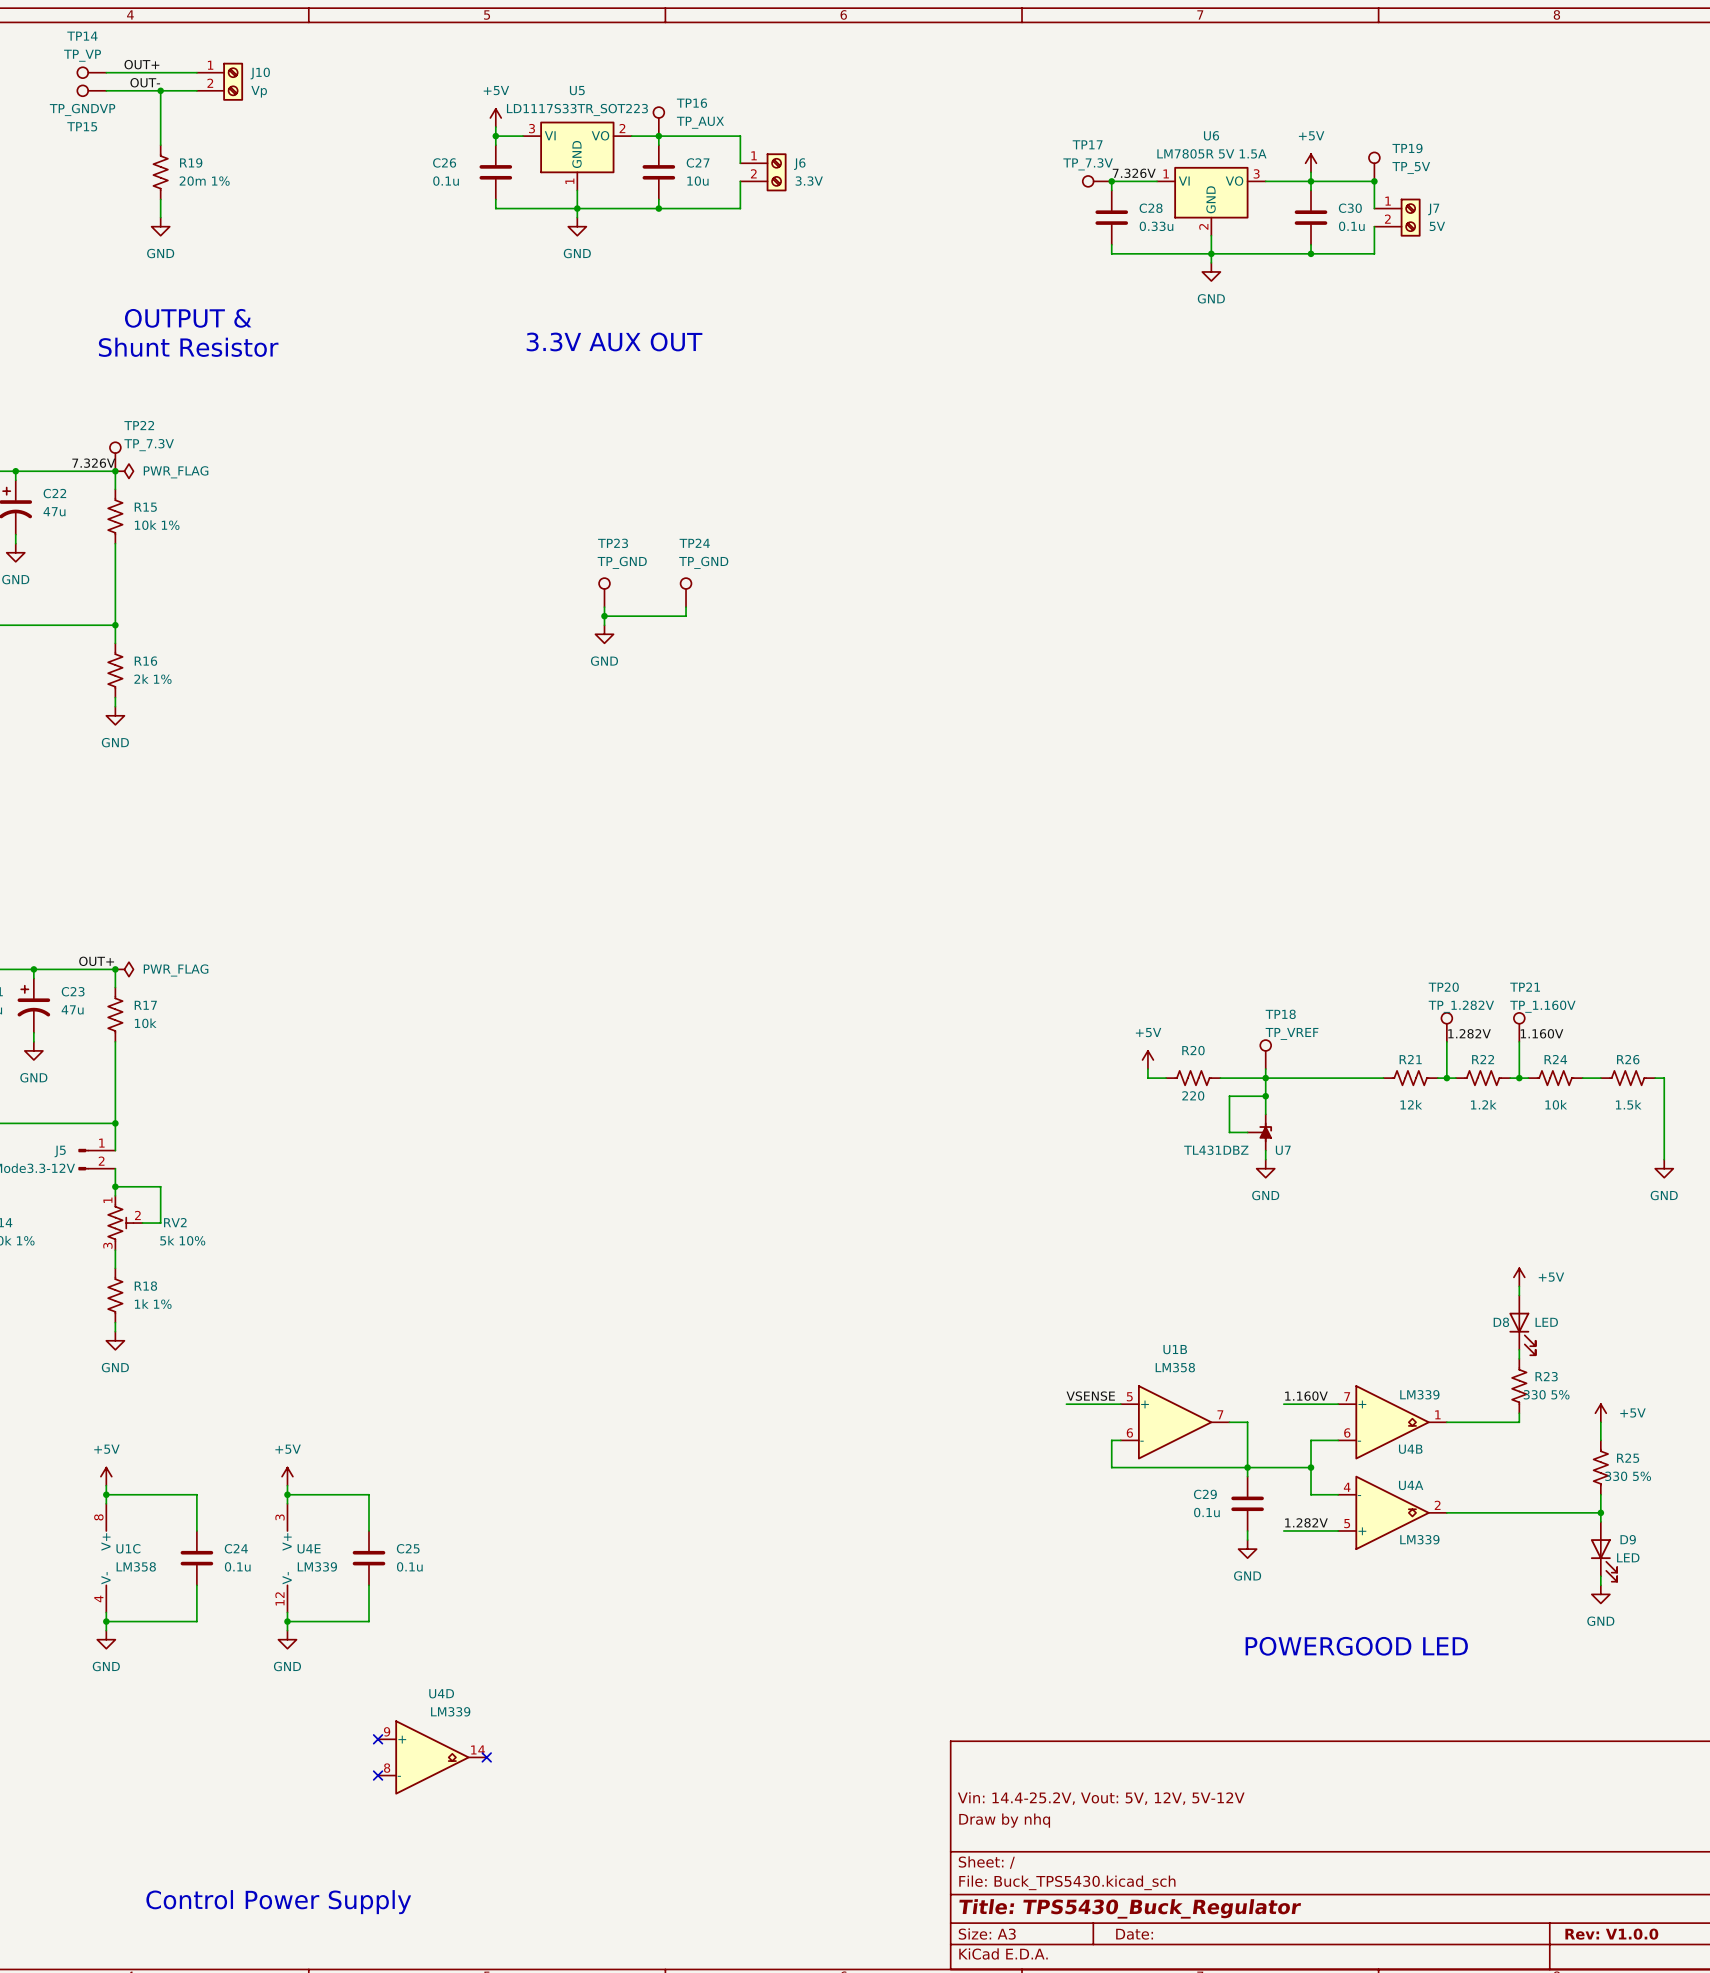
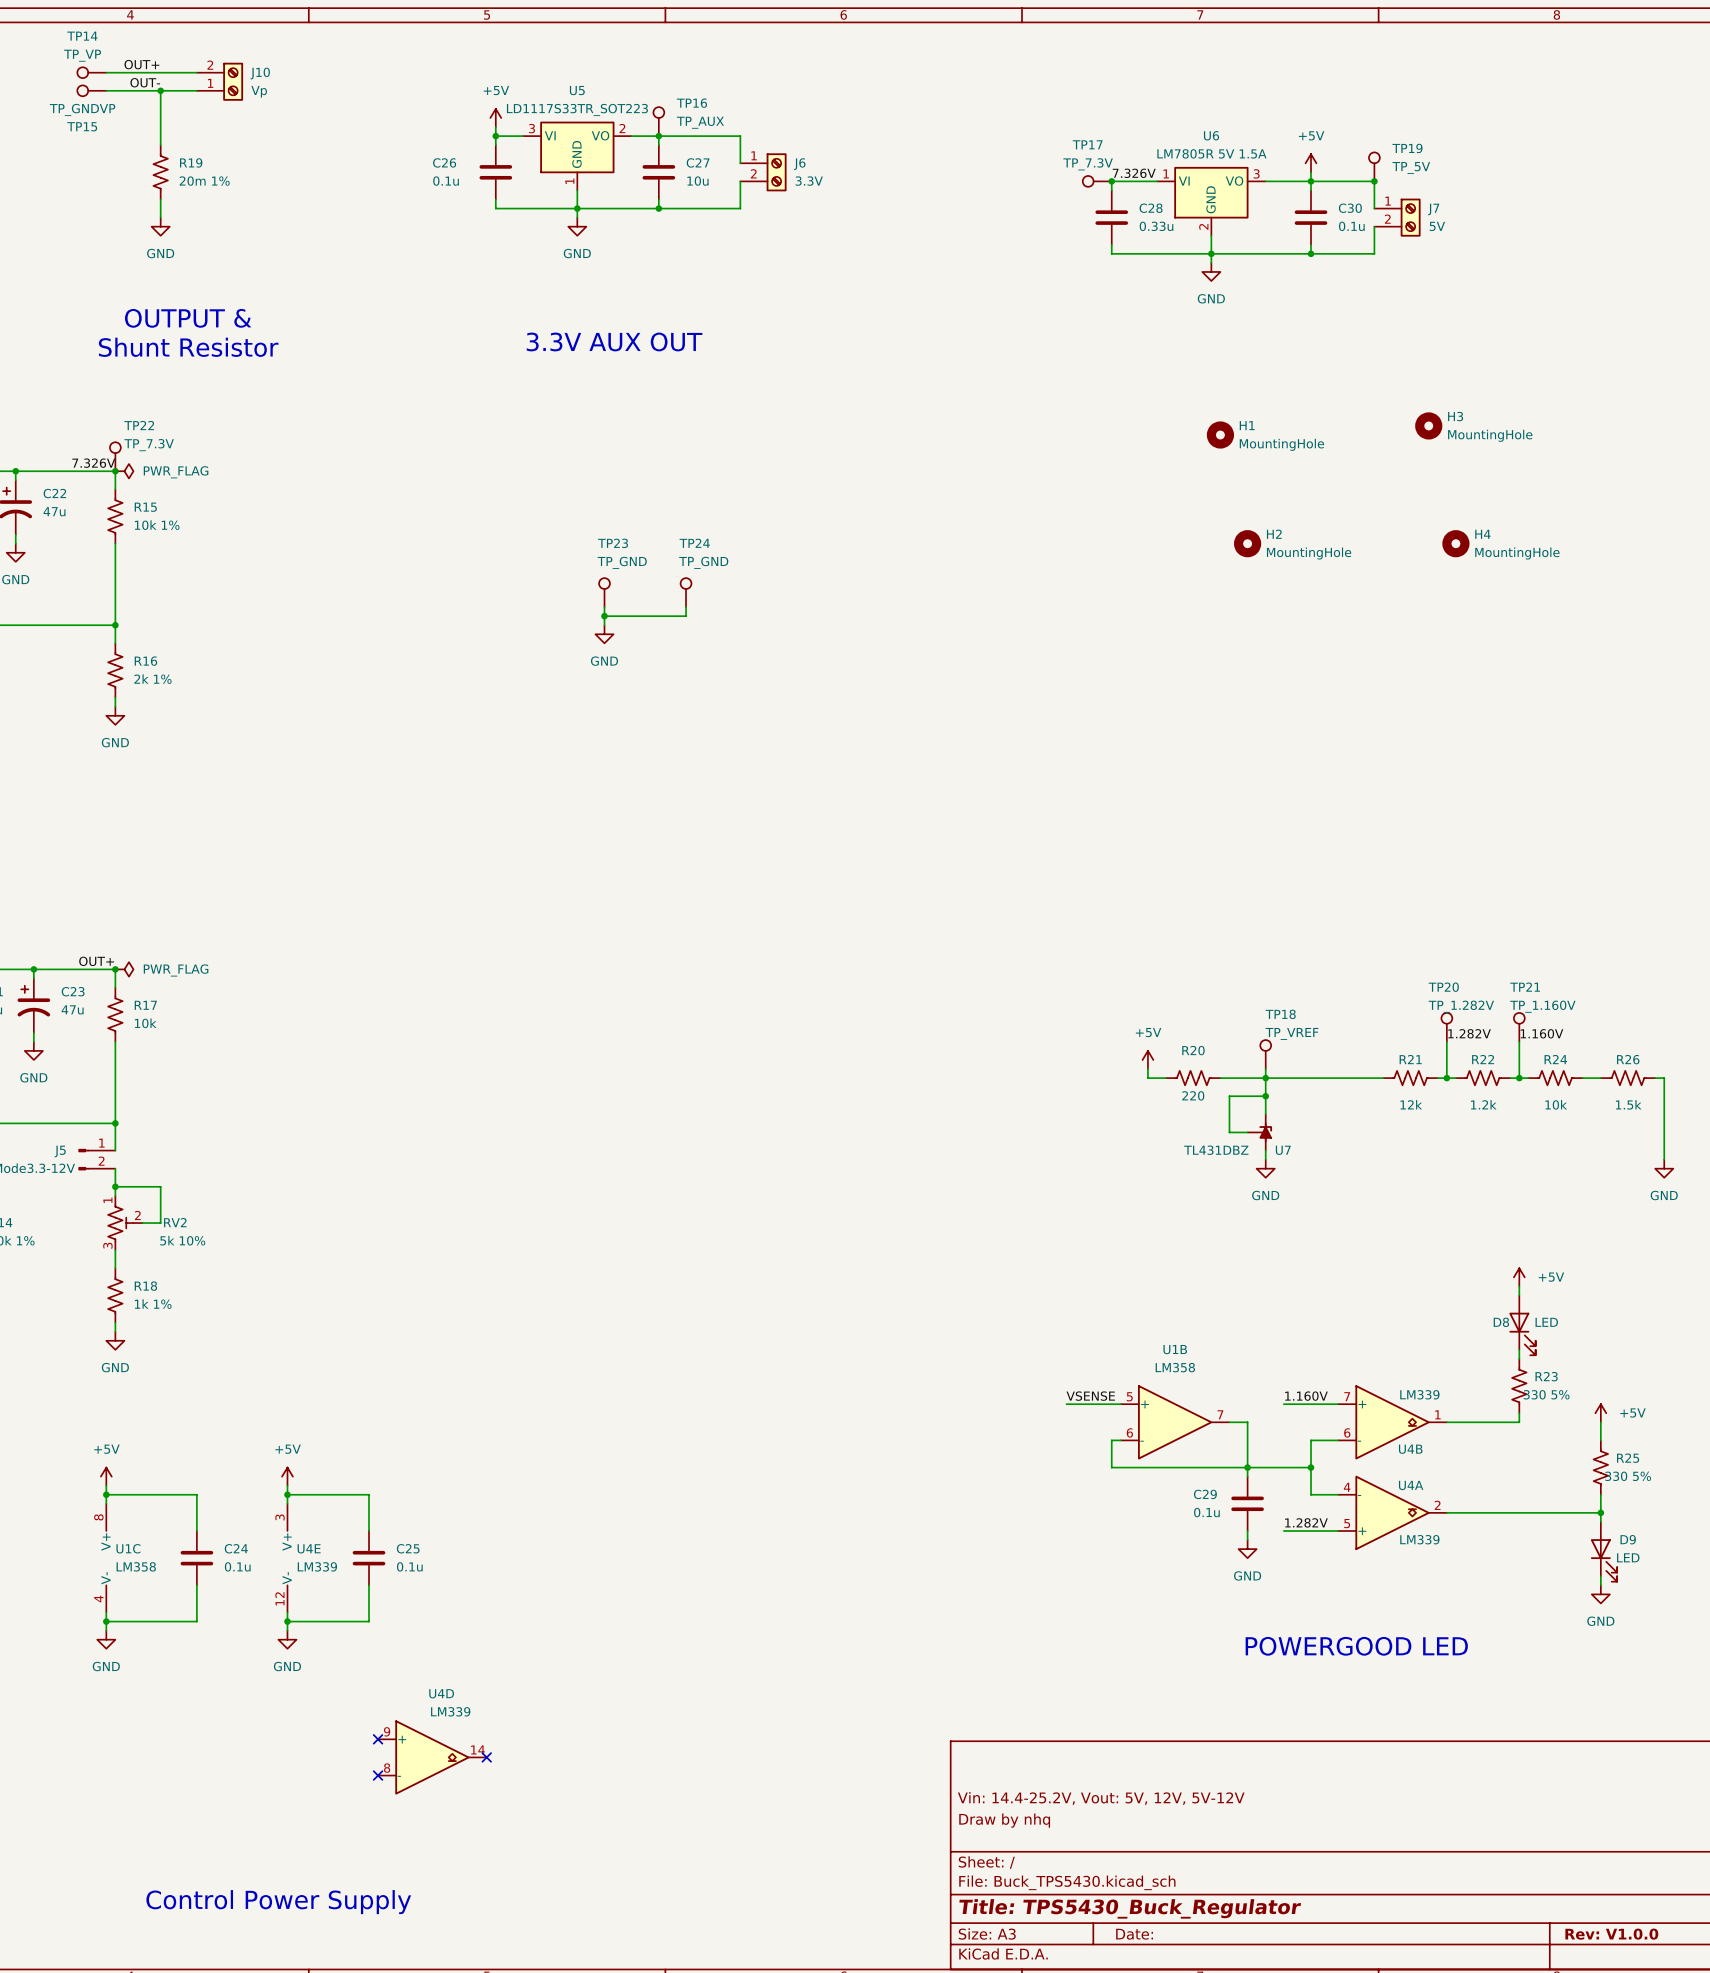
J10 pin number: 1 (210, 65) -> 2 (210, 65)
J10 pin number: 2 (210, 83) -> 1 (210, 83)
H3: none -> MountingHole (1428, 425)
H1: none -> MountingHole (1220, 435)
H2: none -> MountingHole (1247, 543)
H4: none -> MountingHole (1455, 543)

